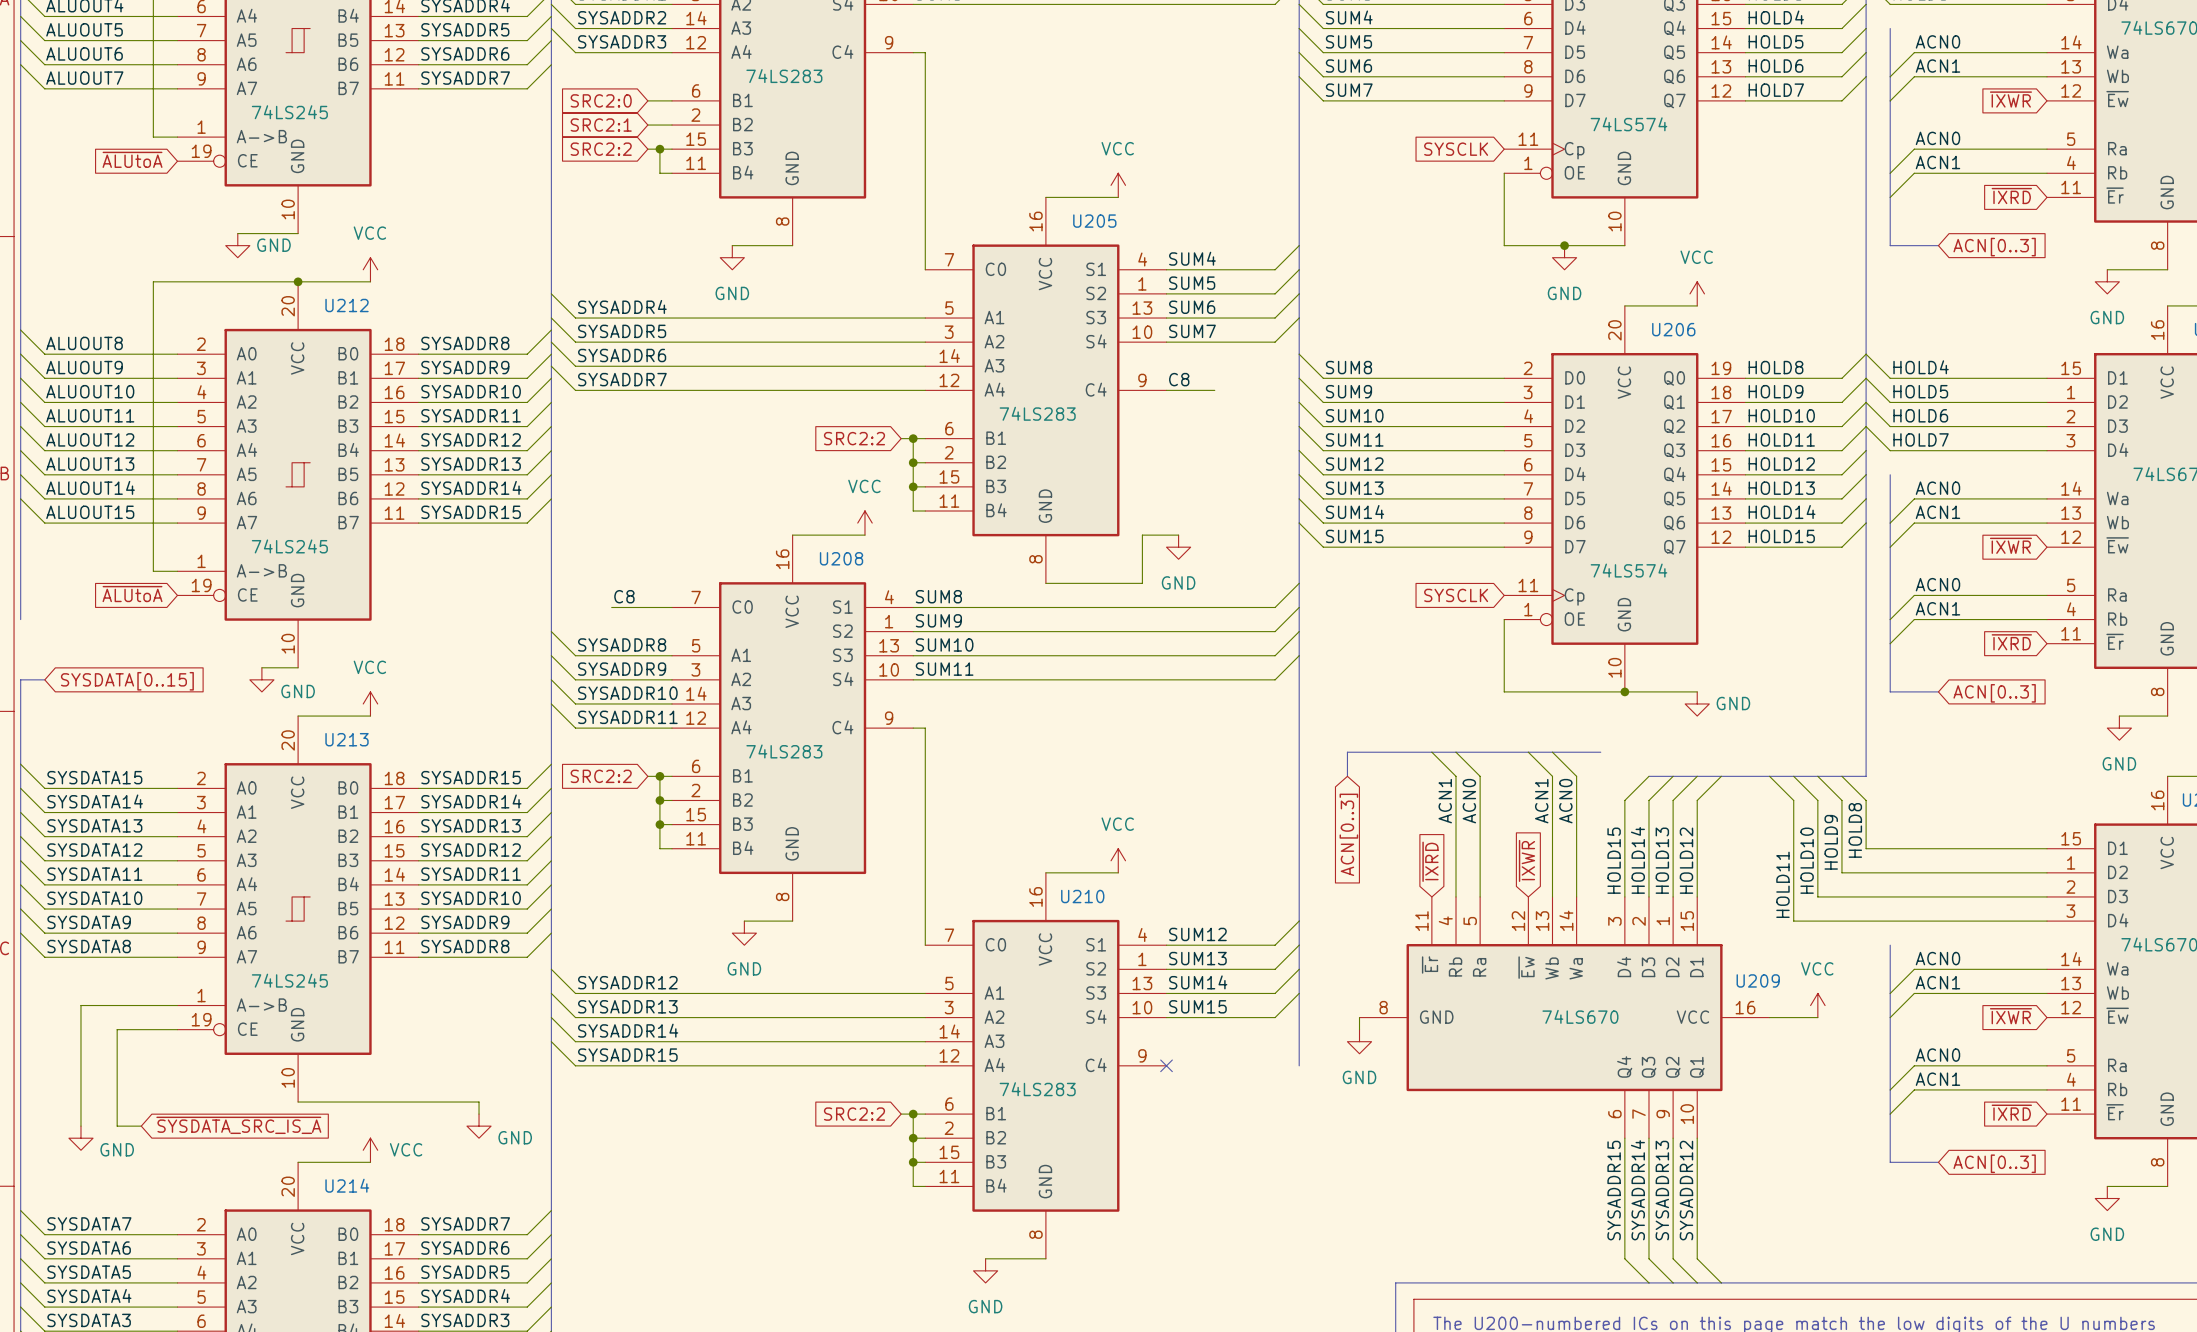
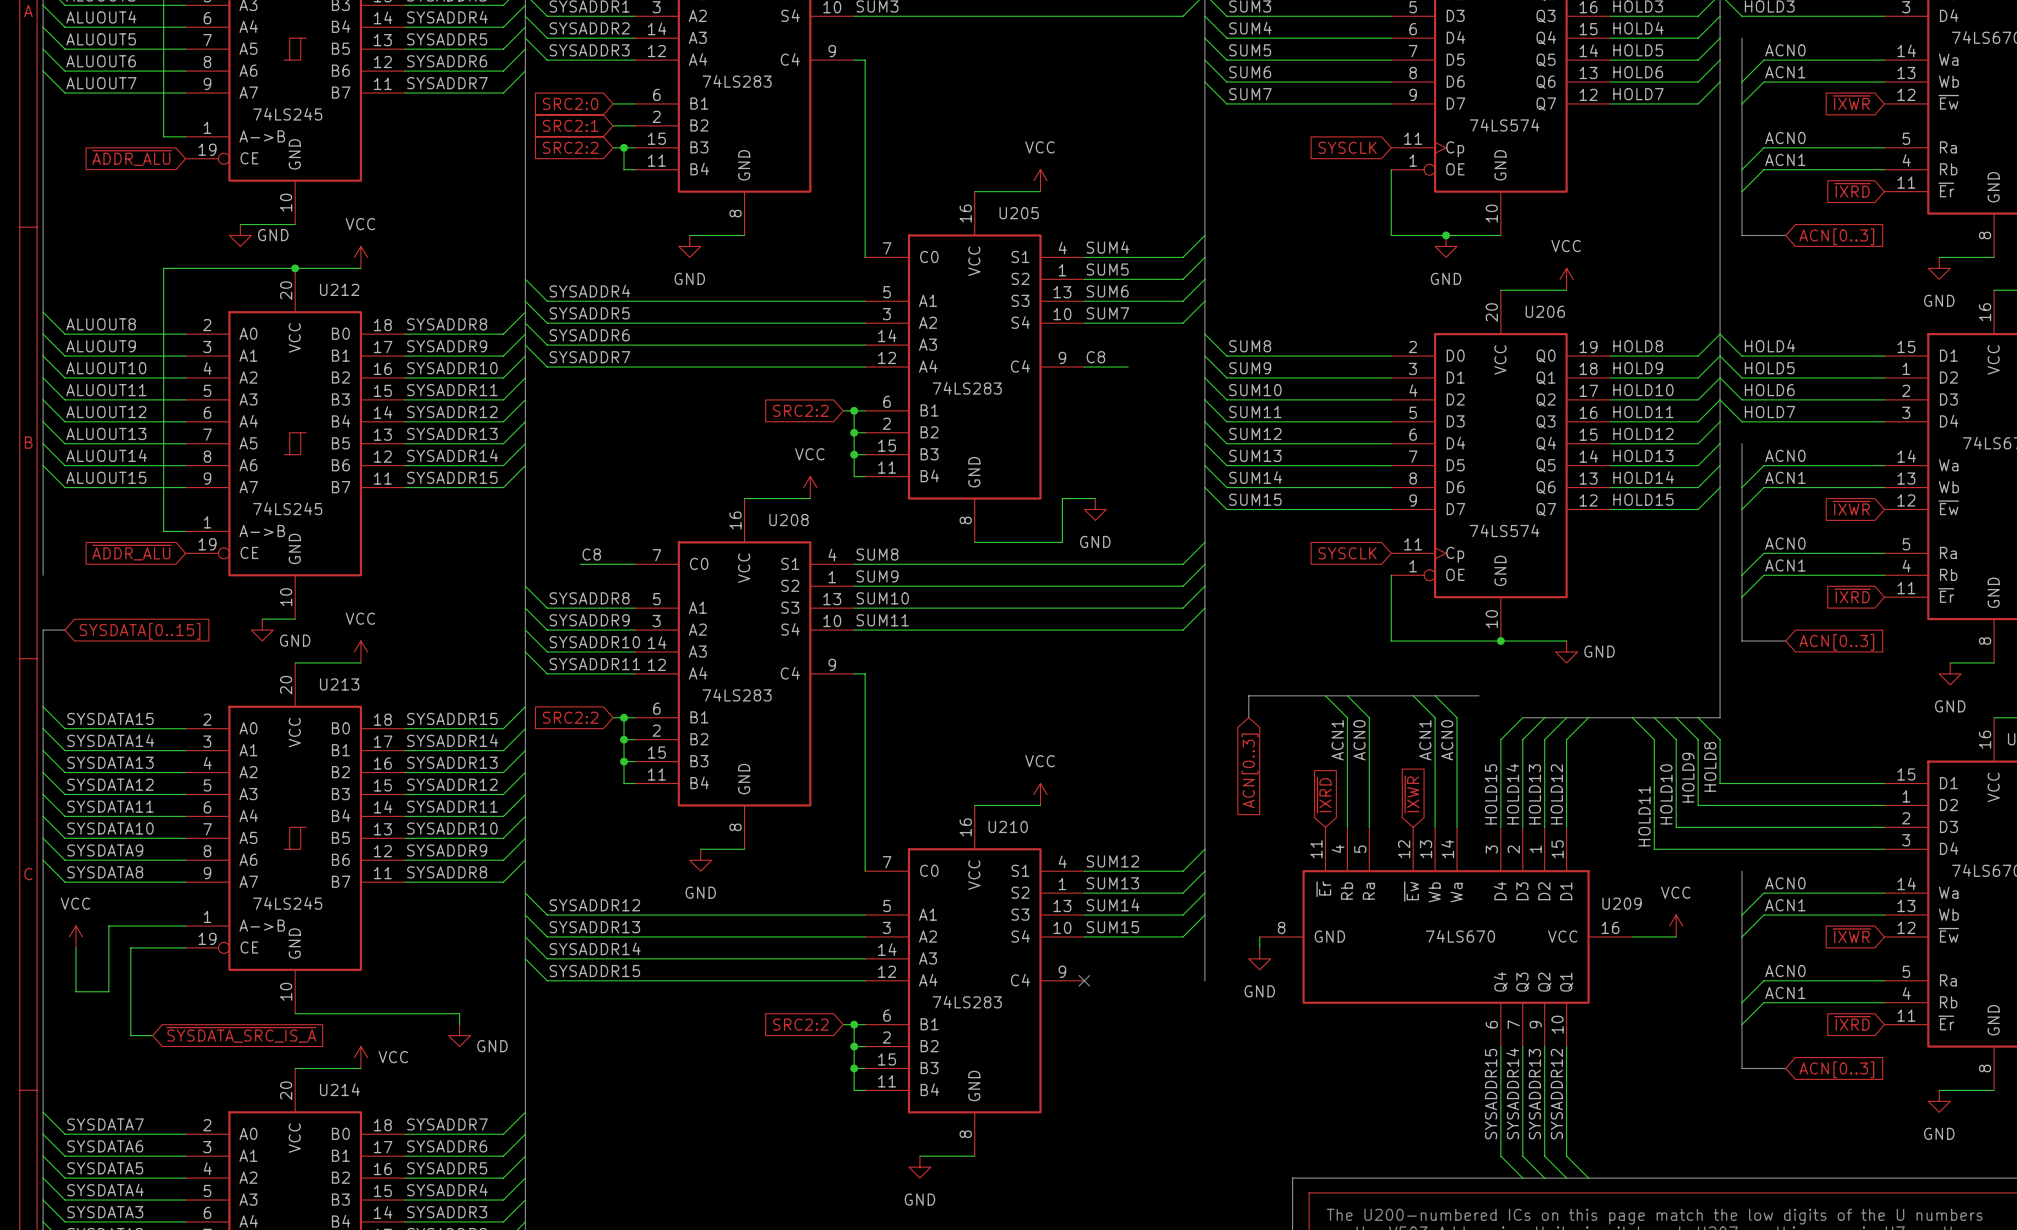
global label: ~{ALUtoA} (132, 159) -> ~{ADDR_ALU} (132, 158)
global label: ~{ALUtoA} (132, 594) -> ~{ADDR_ALU} (132, 552)
wire: (93, 1005) (80, 1005) (80, 1126) -> (108, 926) (108, 991) (75, 991) (75, 947)
power symbol: none -> VCC (75, 936)
power symbol: GND (80, 1138) -> none

